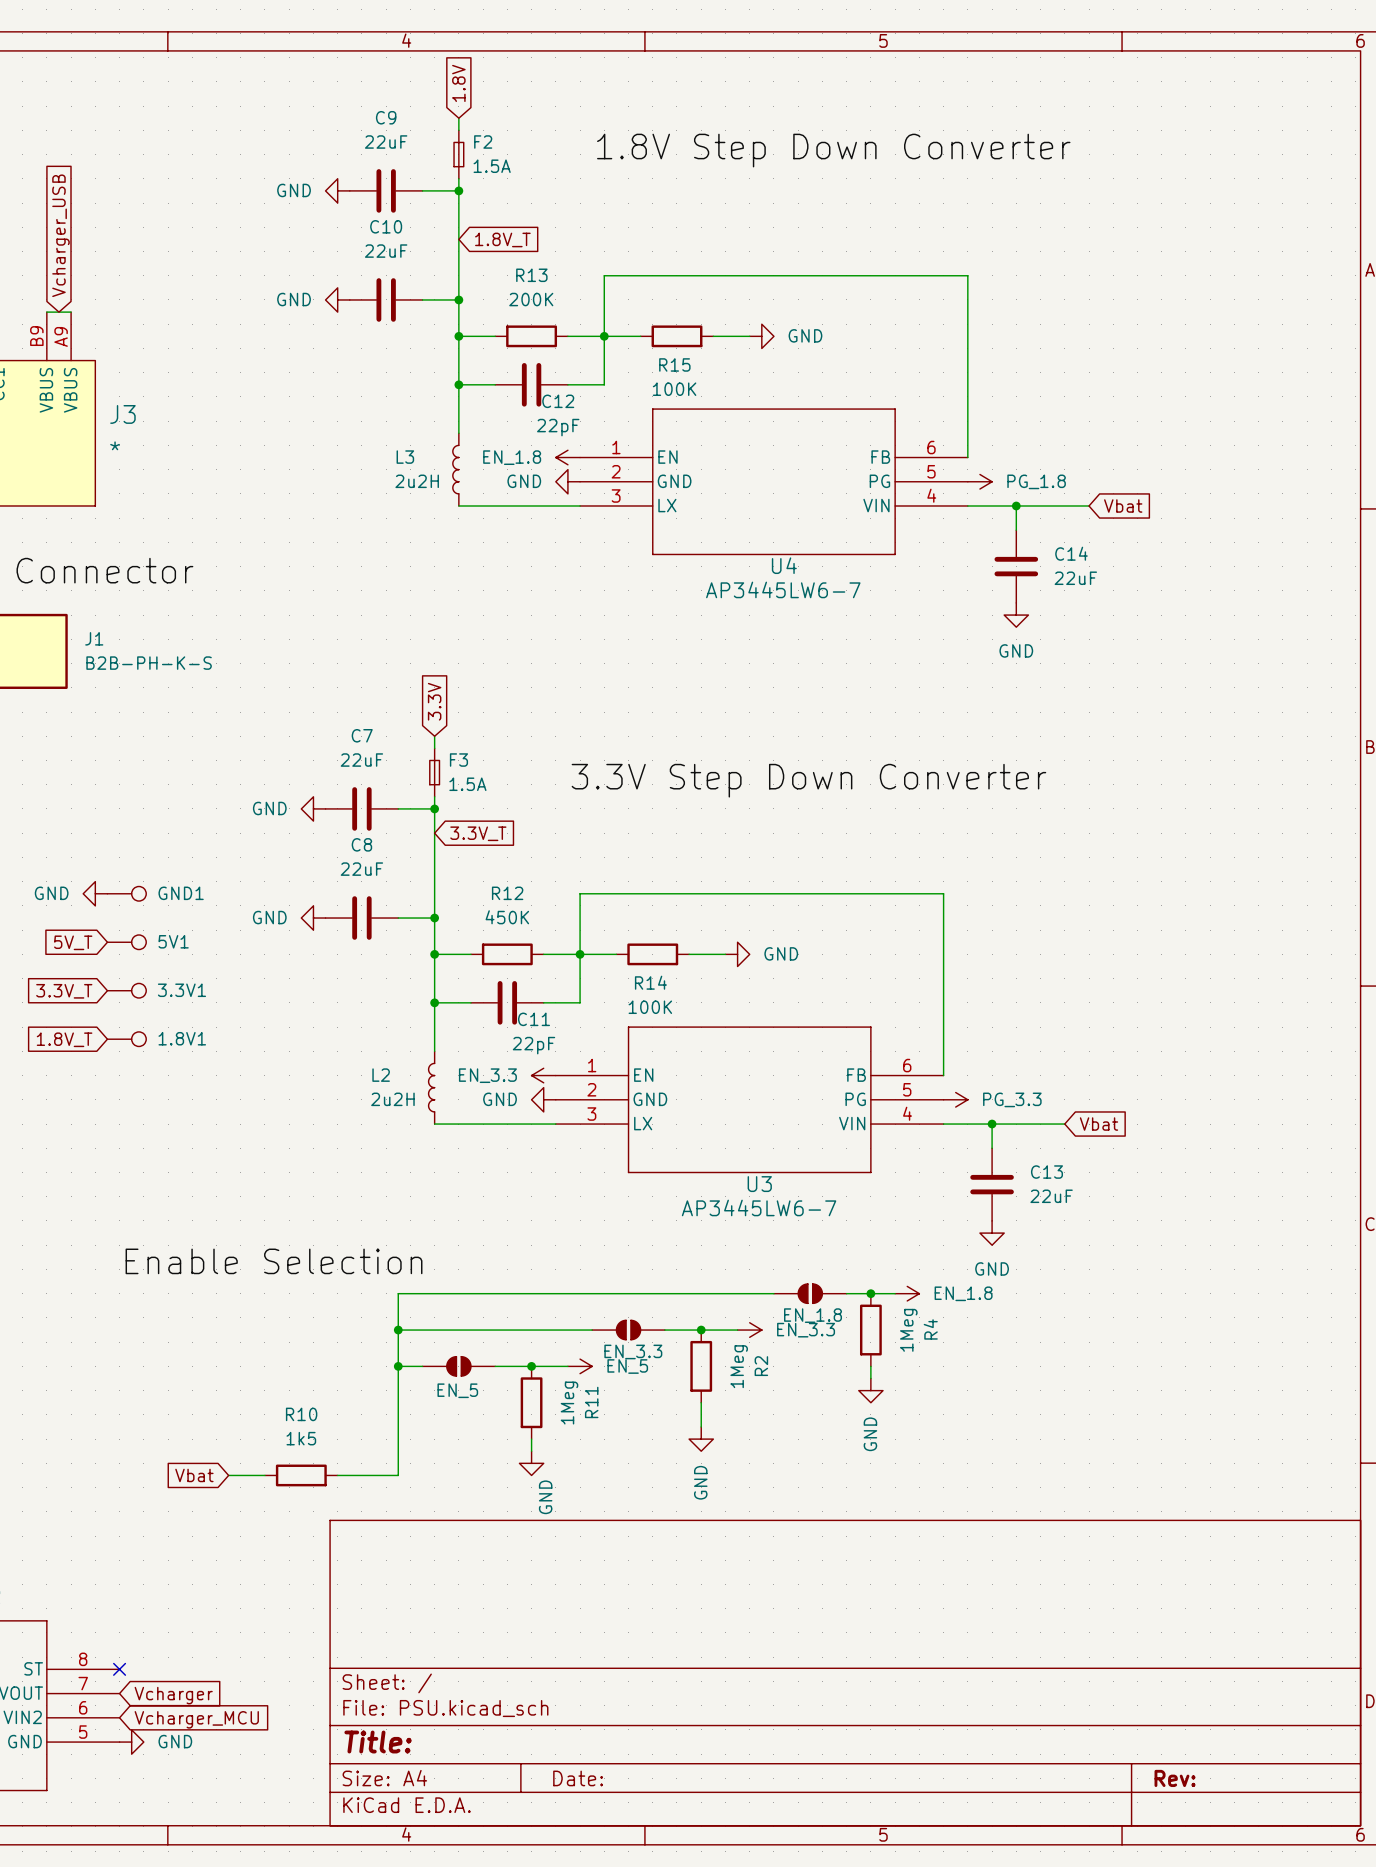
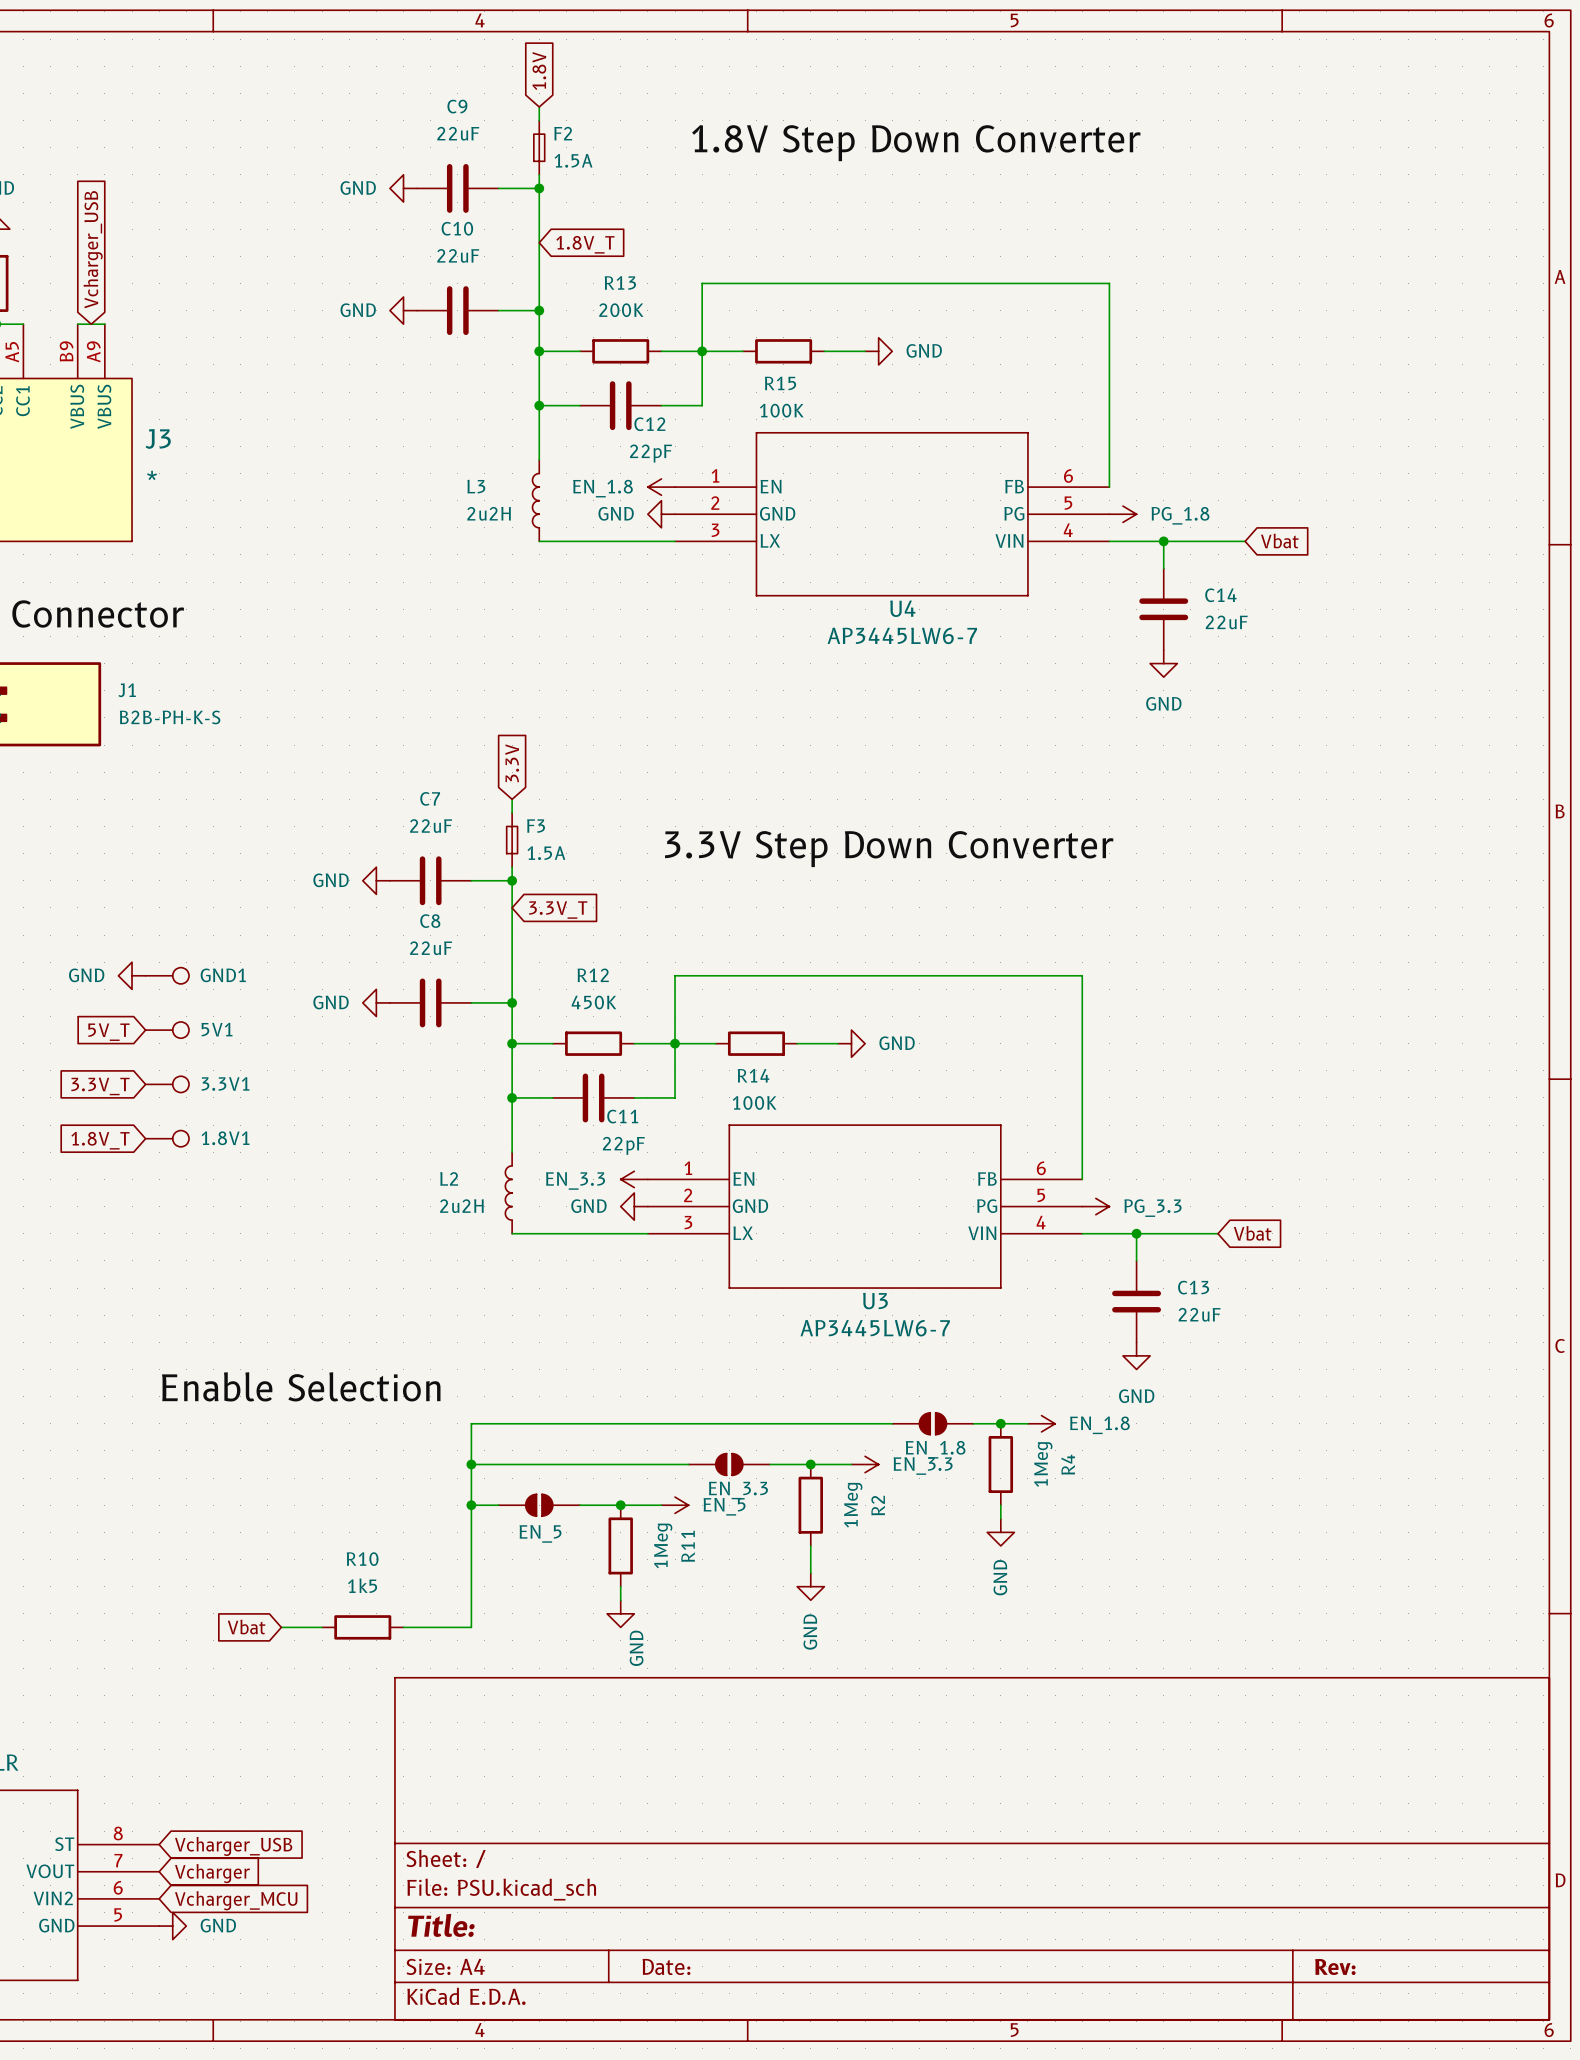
no-connect mark: (119, 1669) -> none
global label: none -> Vcharger_USB (233, 1846)

